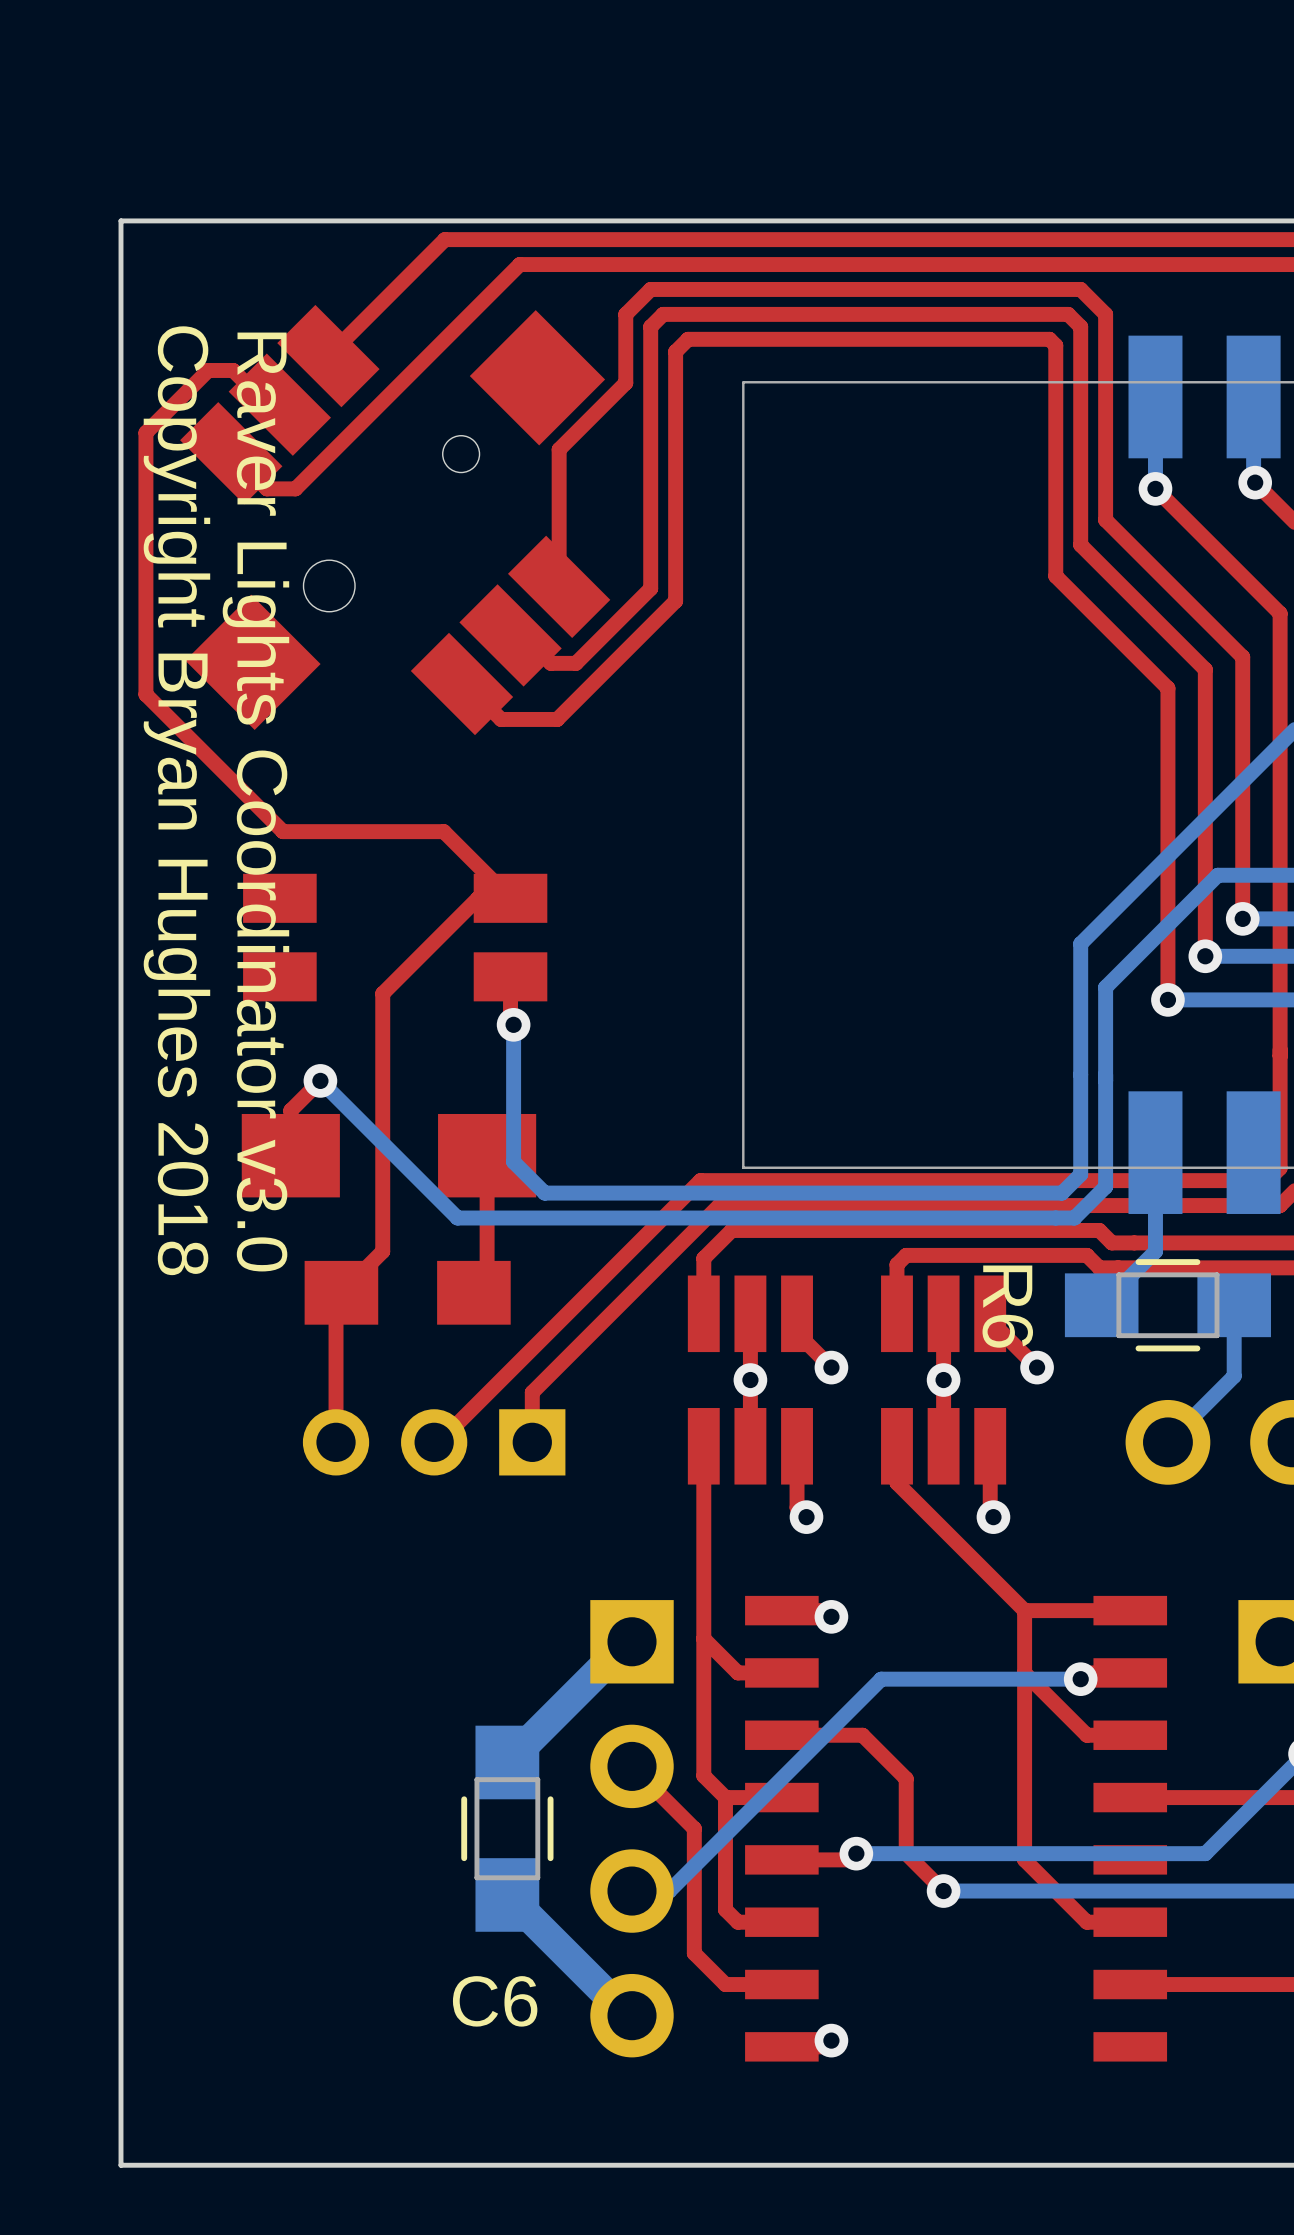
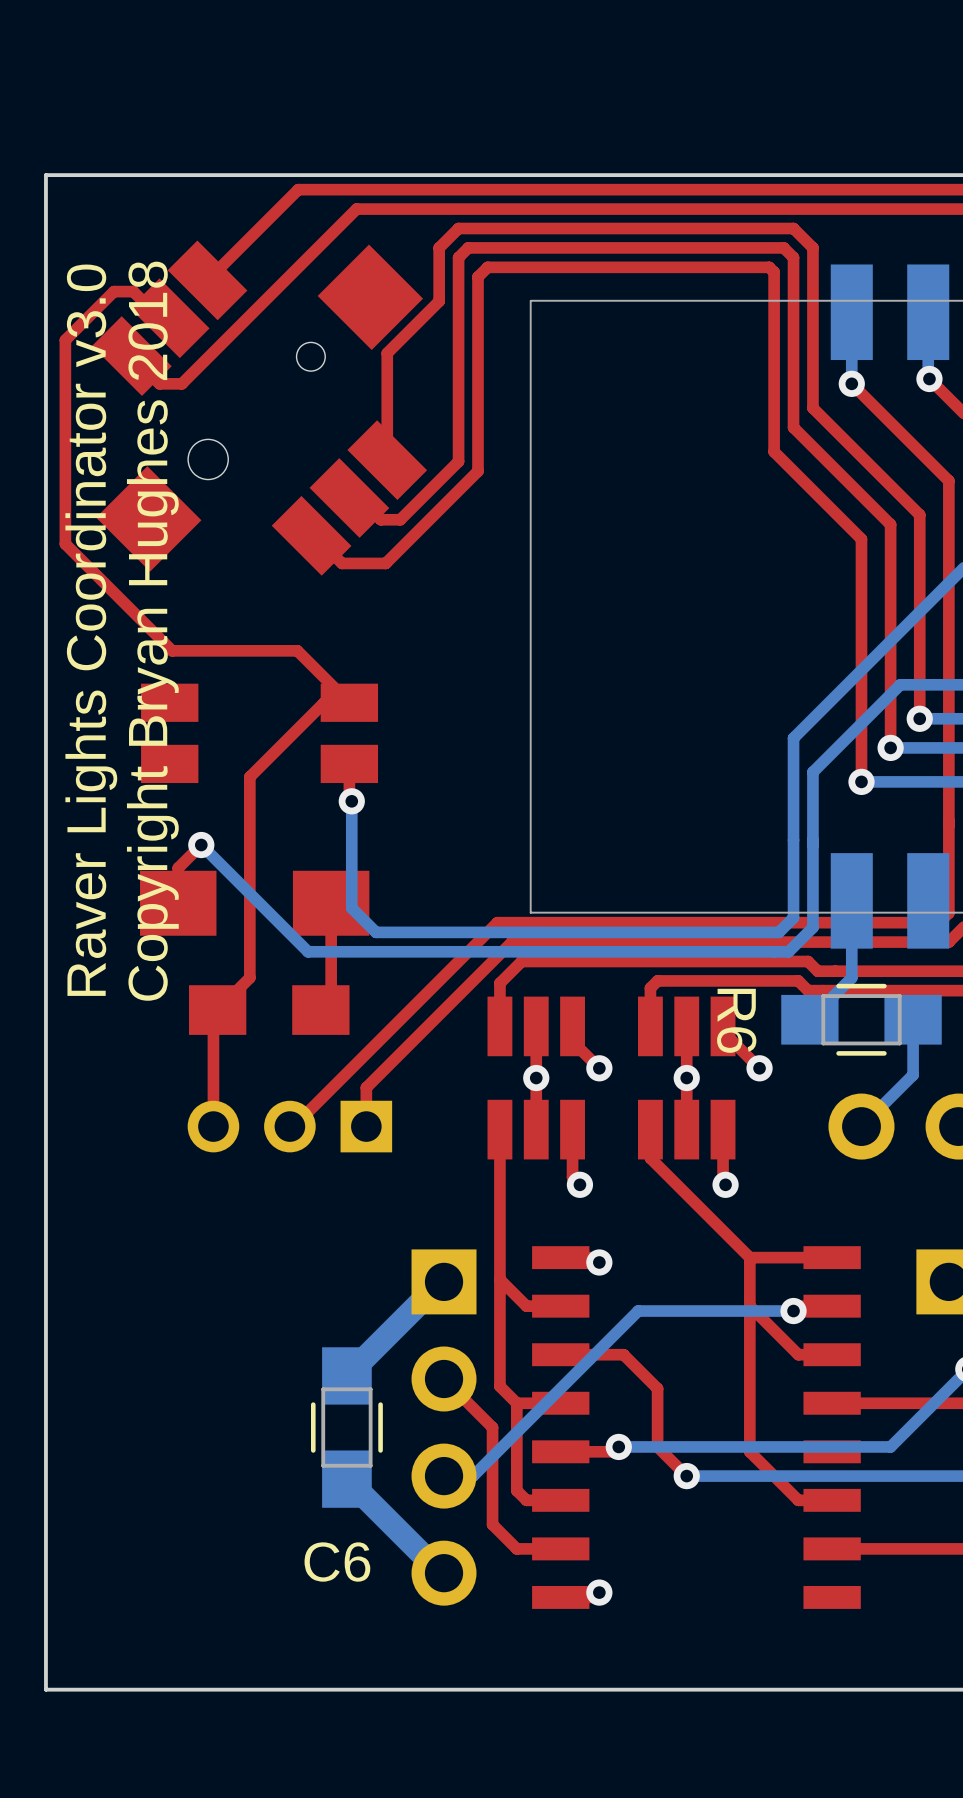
text: Copyright Bryan Hughes 2018 (176, 800) -> Raver Lights Coordinator v3.0 (91, 630)
text: Raver Lights Coordinator v3.0 (255, 802) -> Copyright Bryan Hughes 2018 (152, 631)

